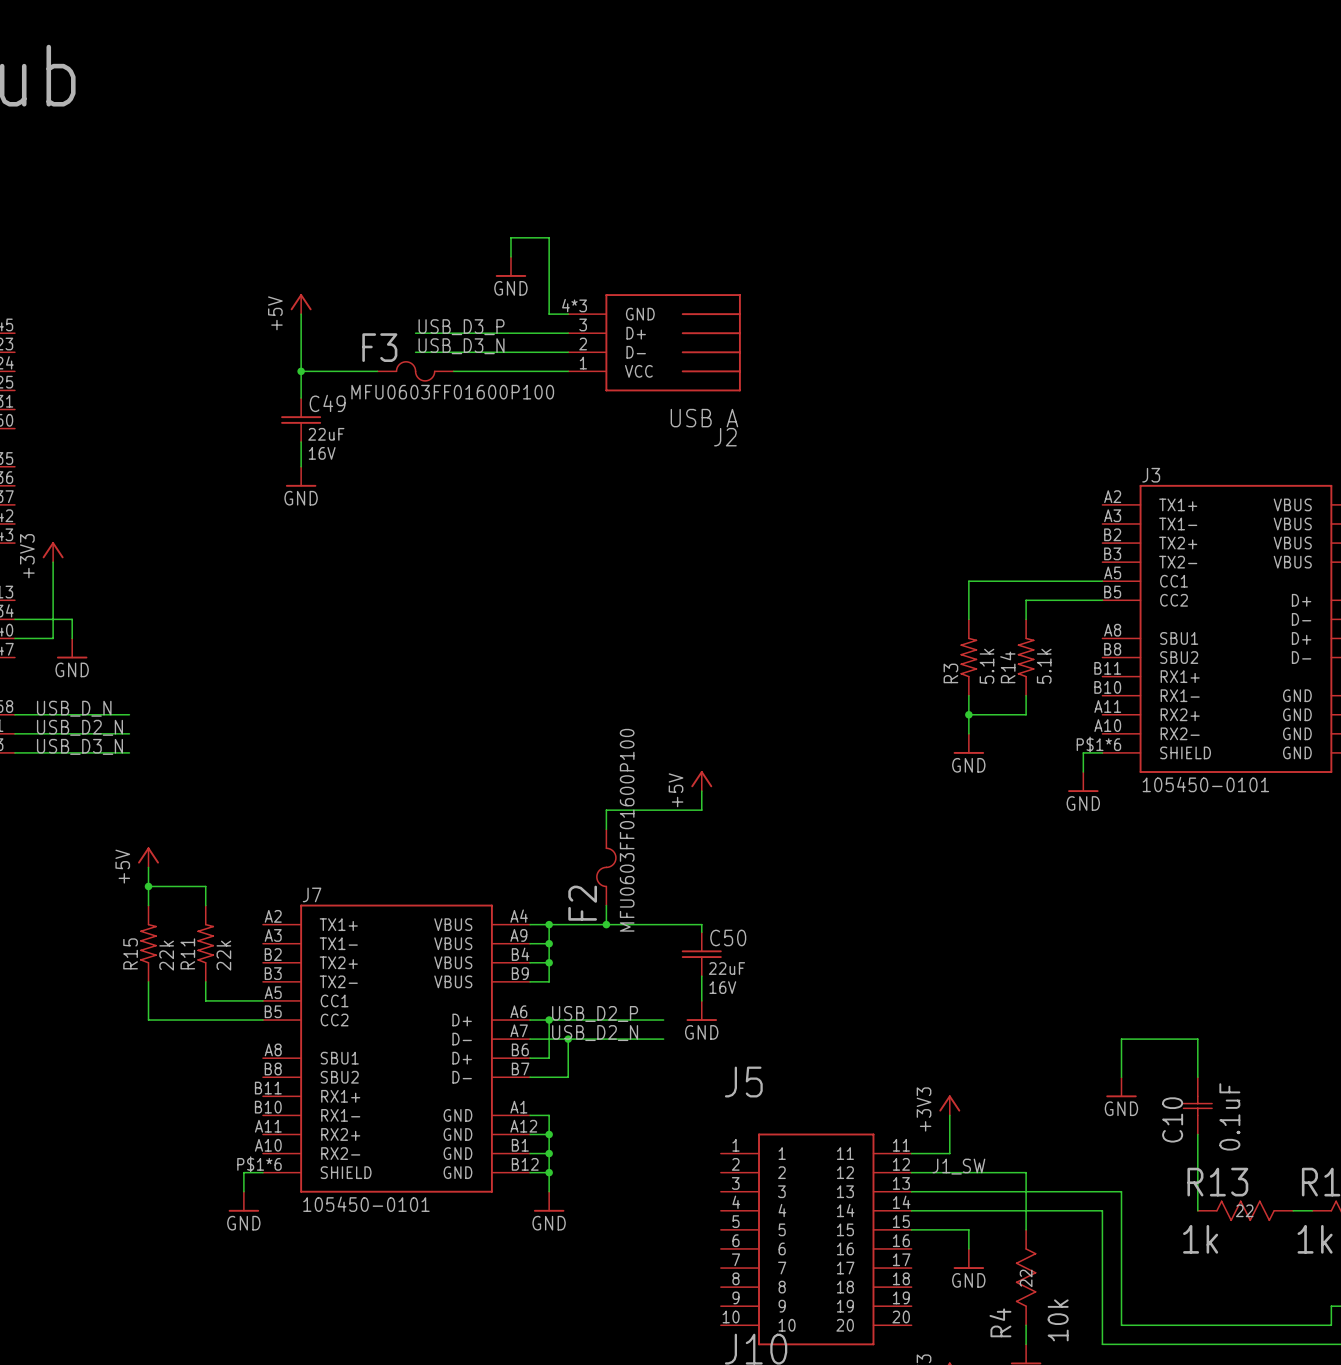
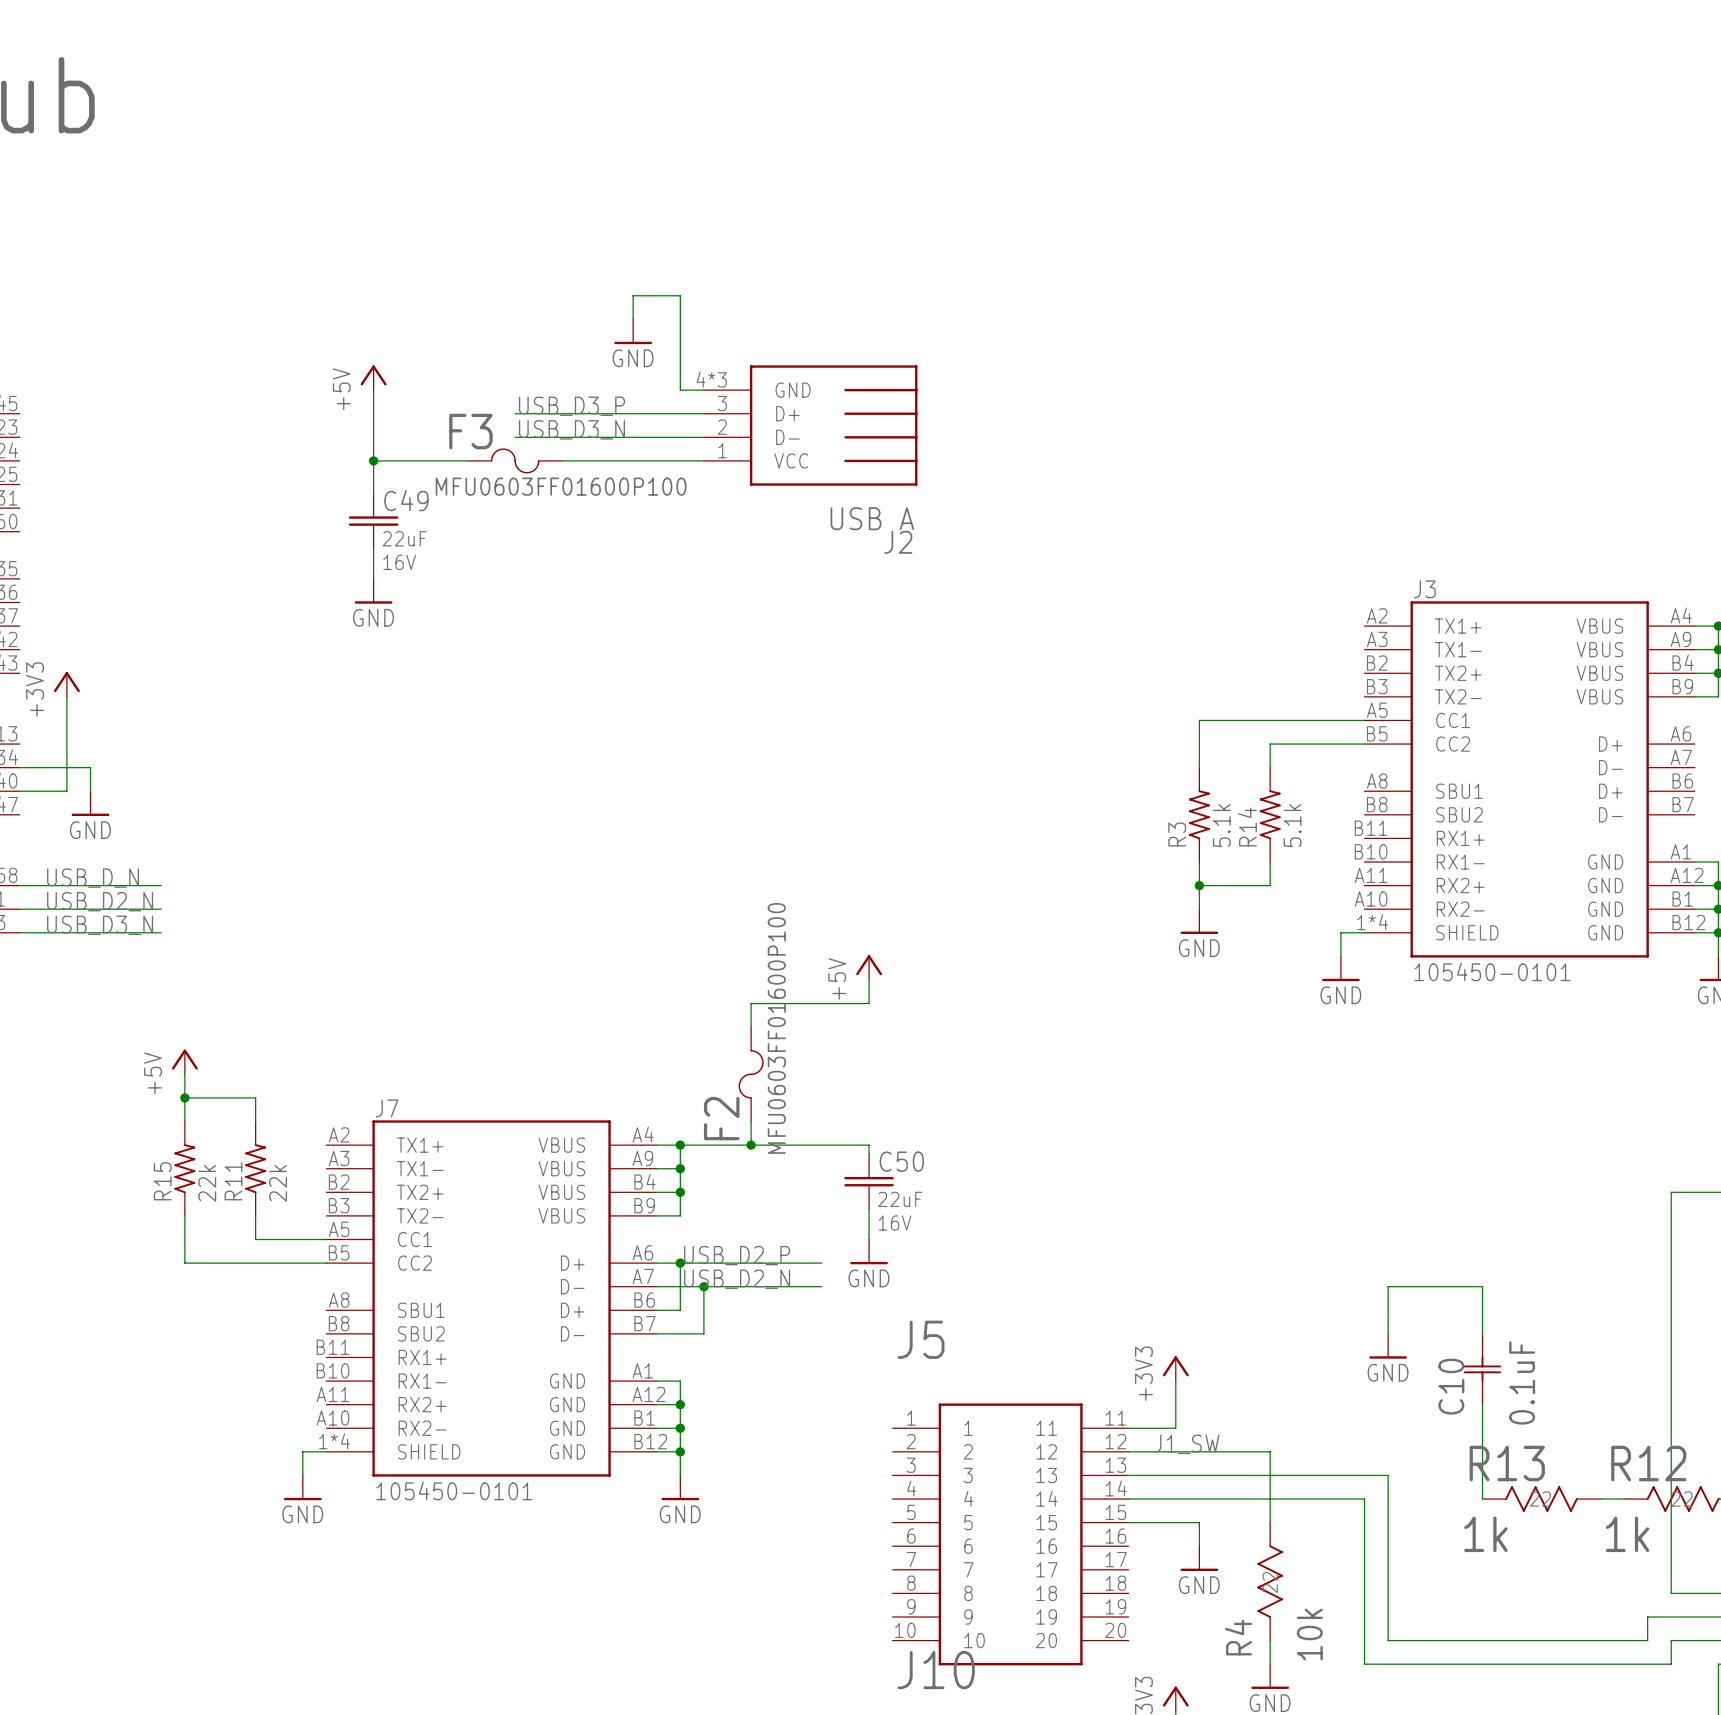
J3 pin number: P$1*6 (1098, 744) -> 1*4 (1372, 922)
J7 pin number: P$1*6 (259, 1164) -> 1*4 (334, 1441)

